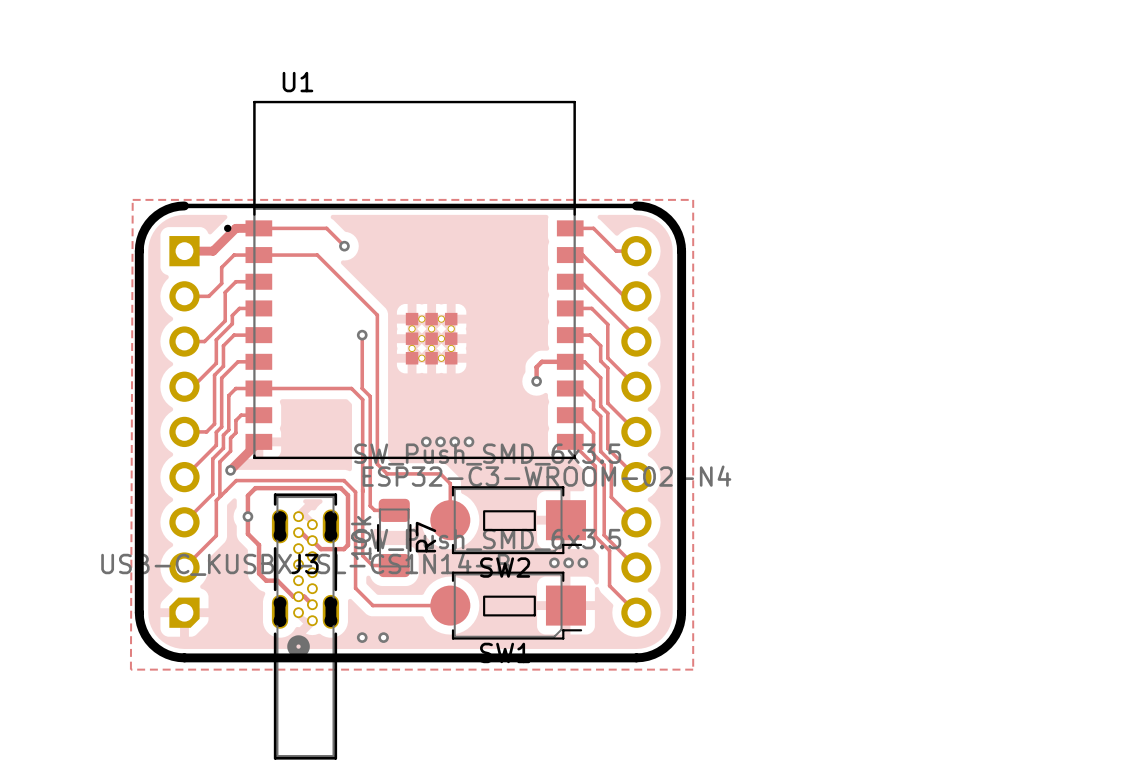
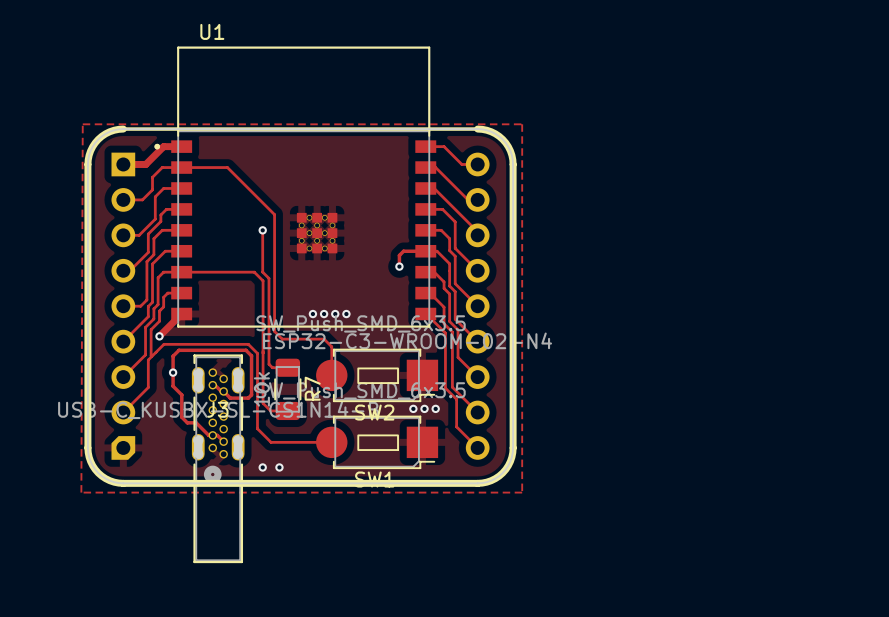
track: (258, 228) (326, 228) (344, 246) -> none
via: (344, 246) -> none

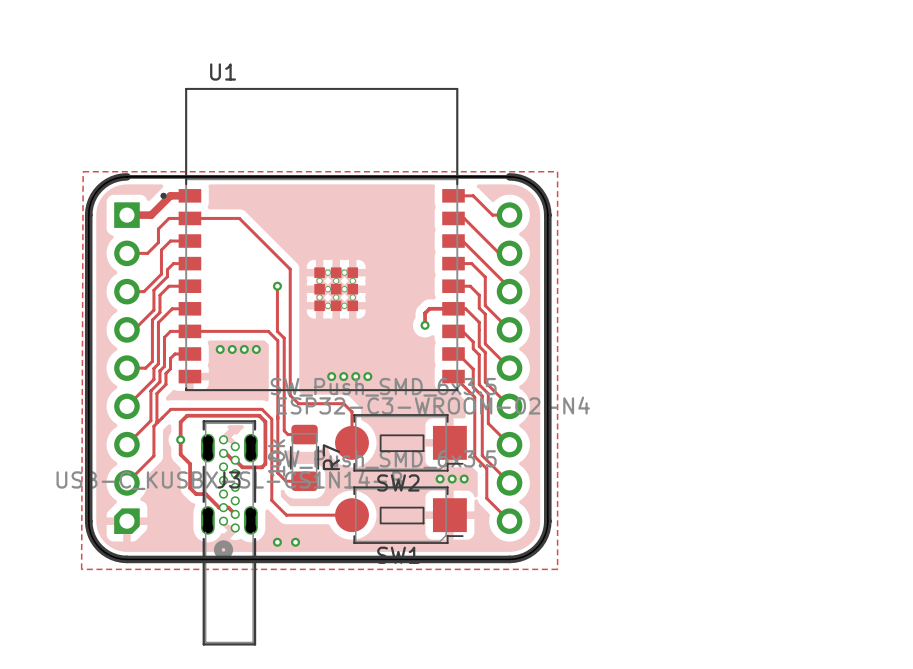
via: none -> (220, 349)
via: none -> (232, 349)
via: none -> (244, 349)
via: none -> (256, 349)
track: (181, 314) (159, 336) -> none
via: (159, 336) -> none

